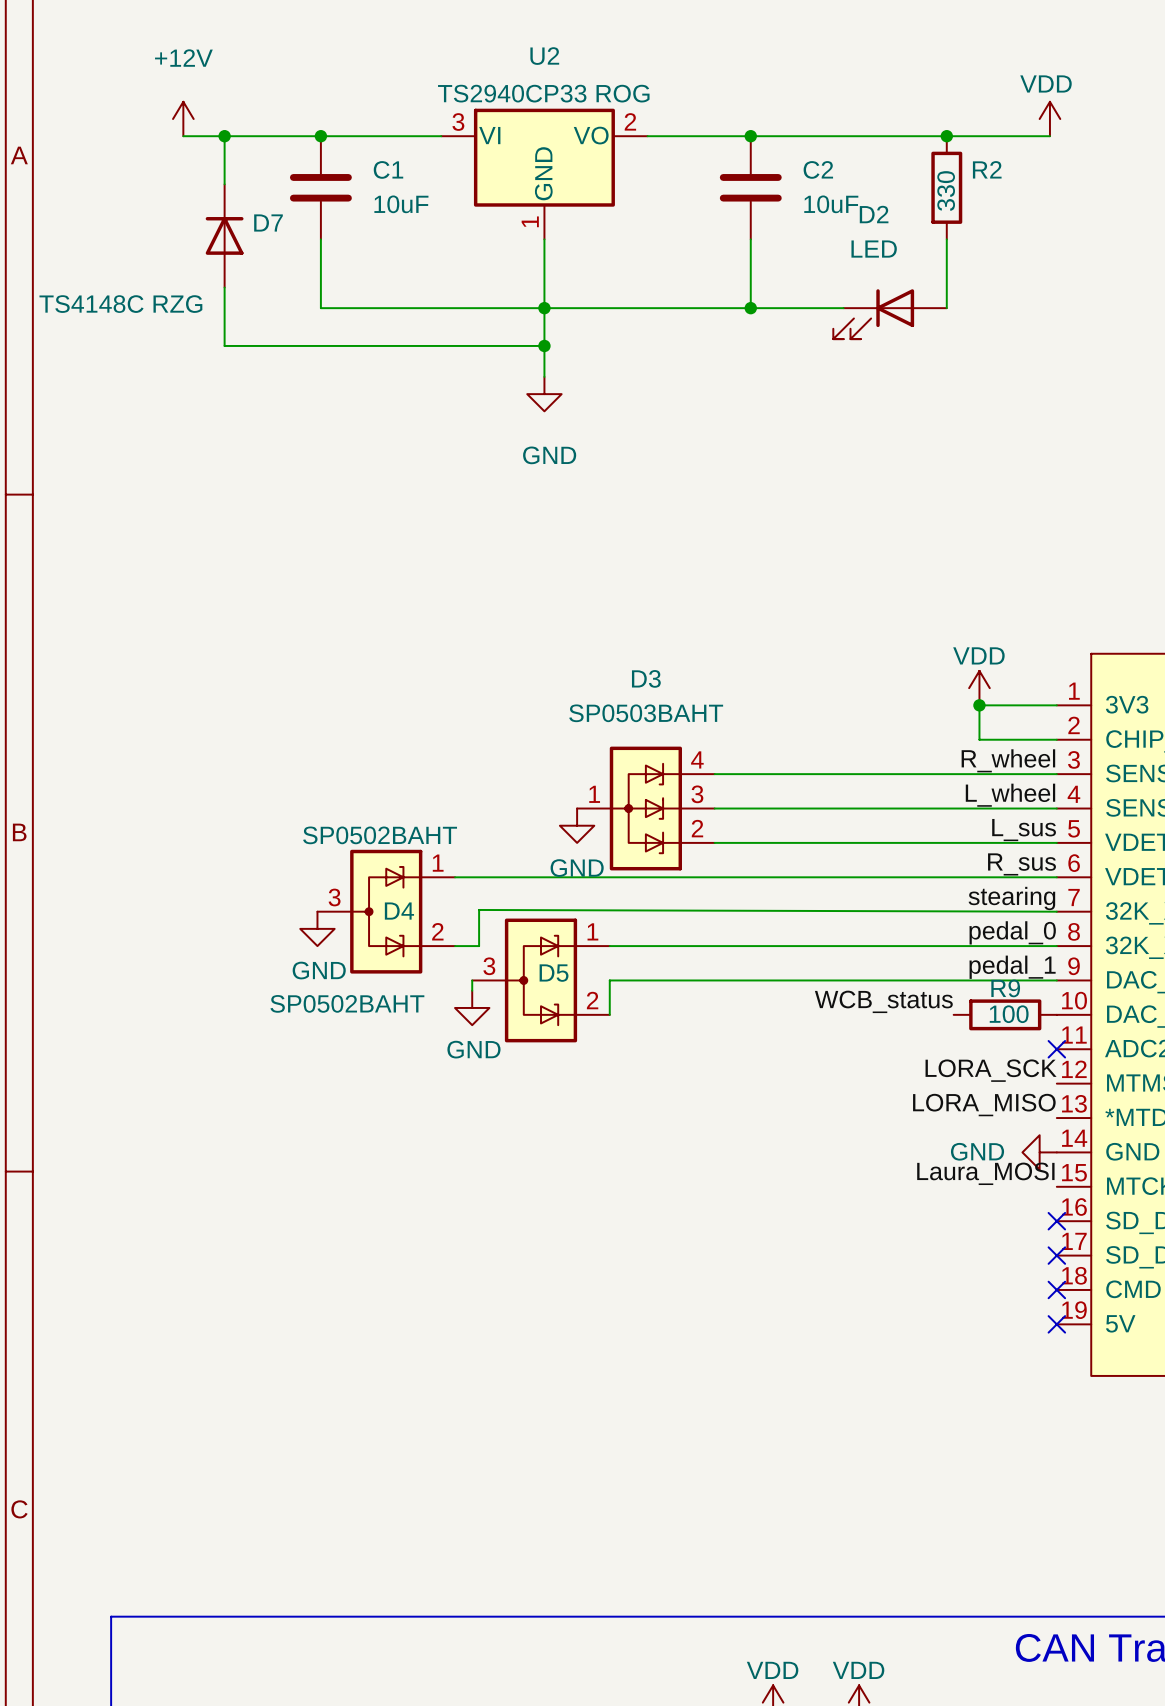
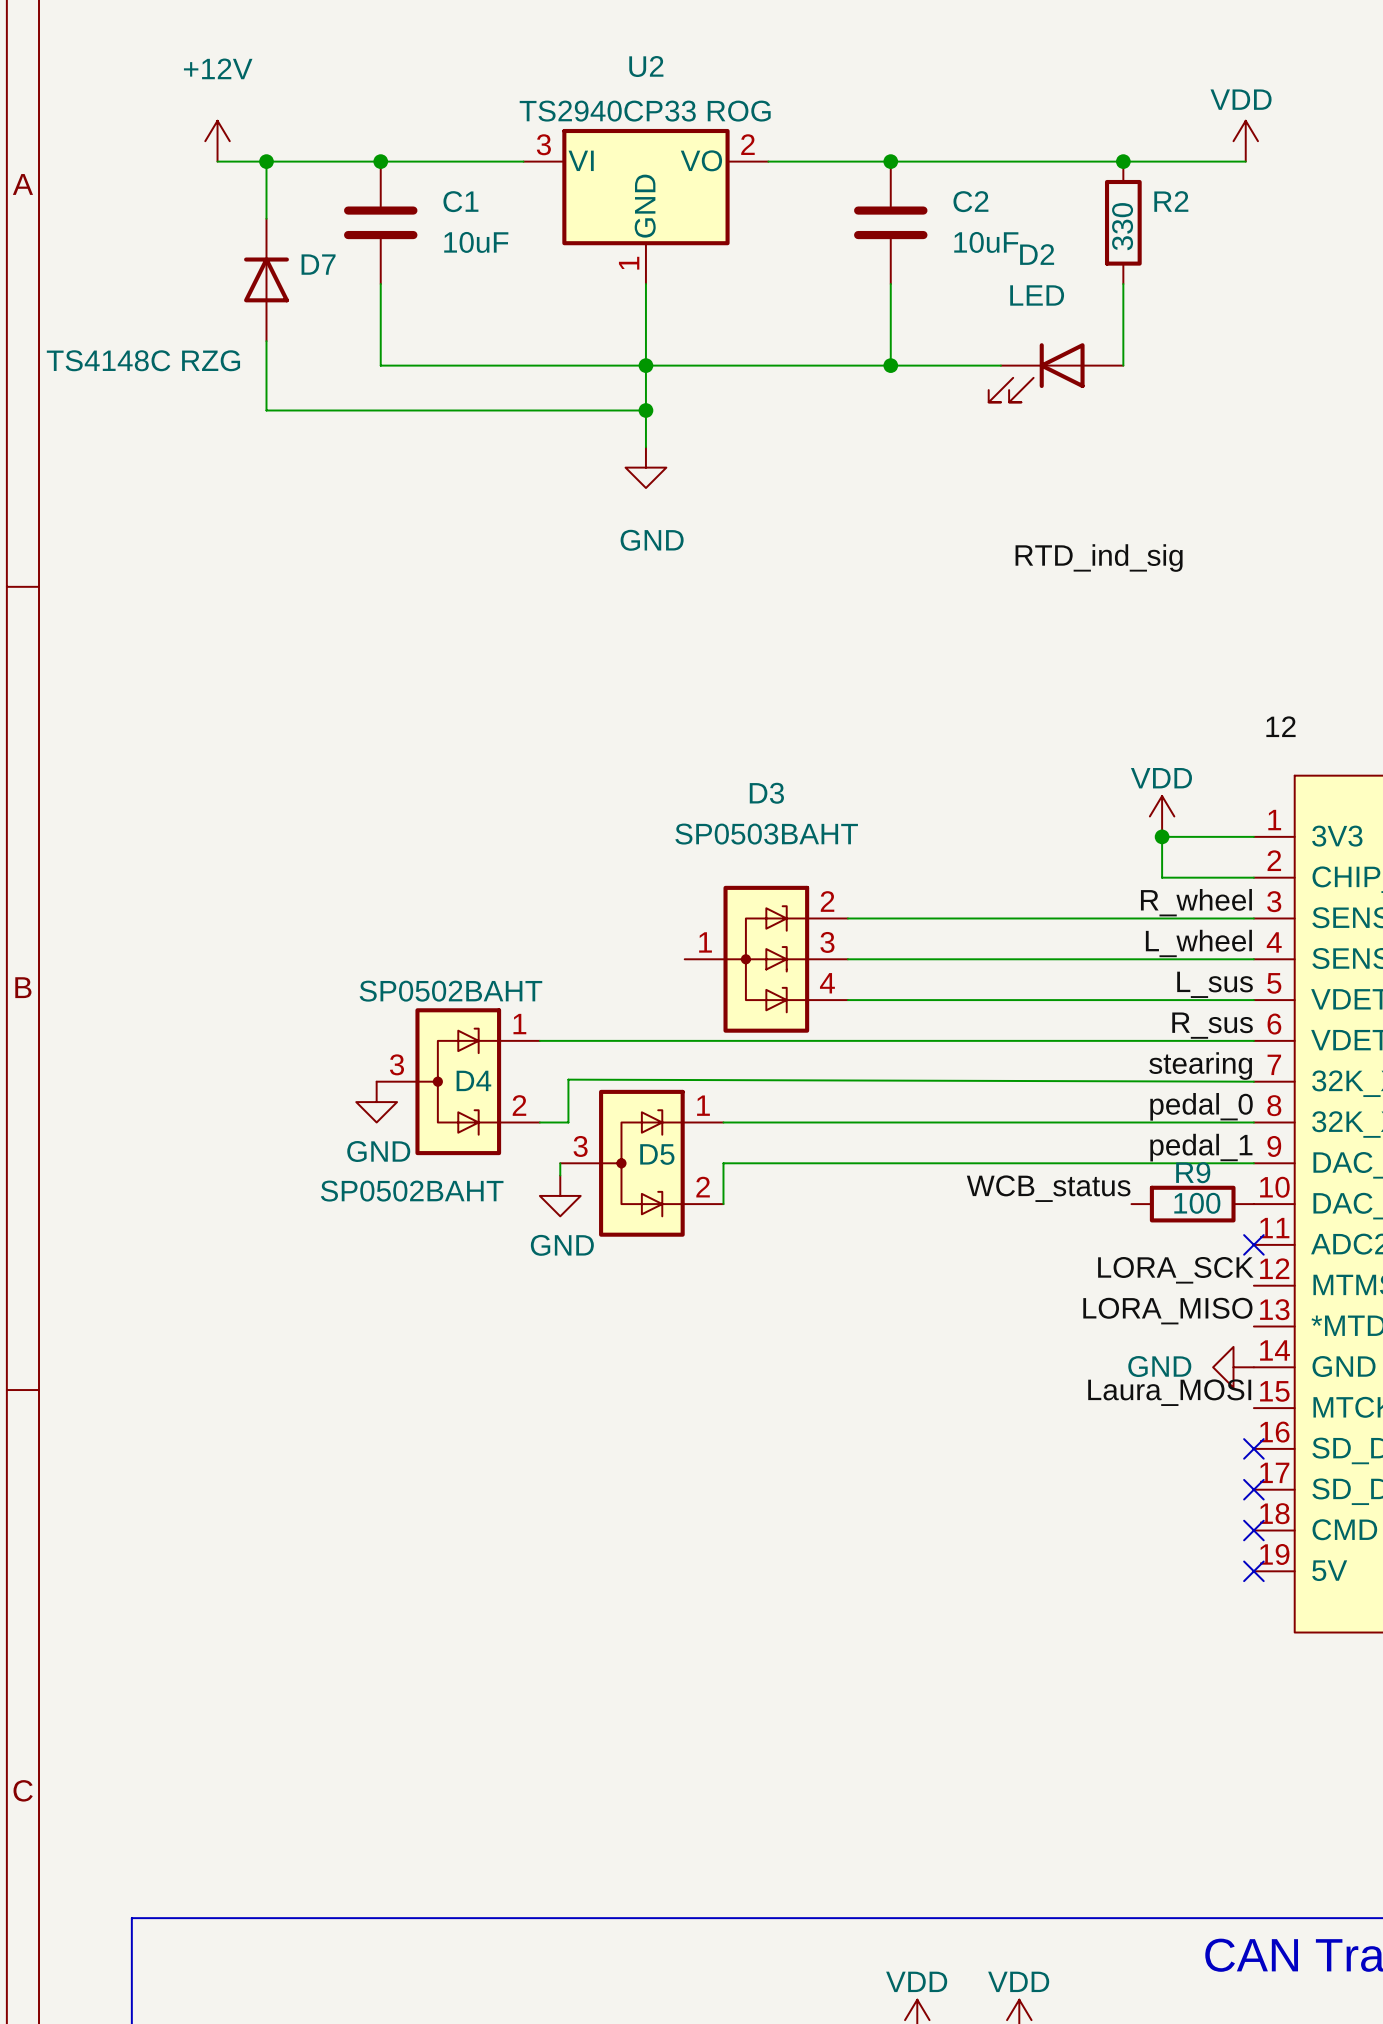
label: none -> RTD_ind_sig (1099, 558)
label: none -> 12 (1280, 726)
D3 flip: as is (645, 808) -> up-down (766, 959)
power symbol: GND (577, 825) -> none

